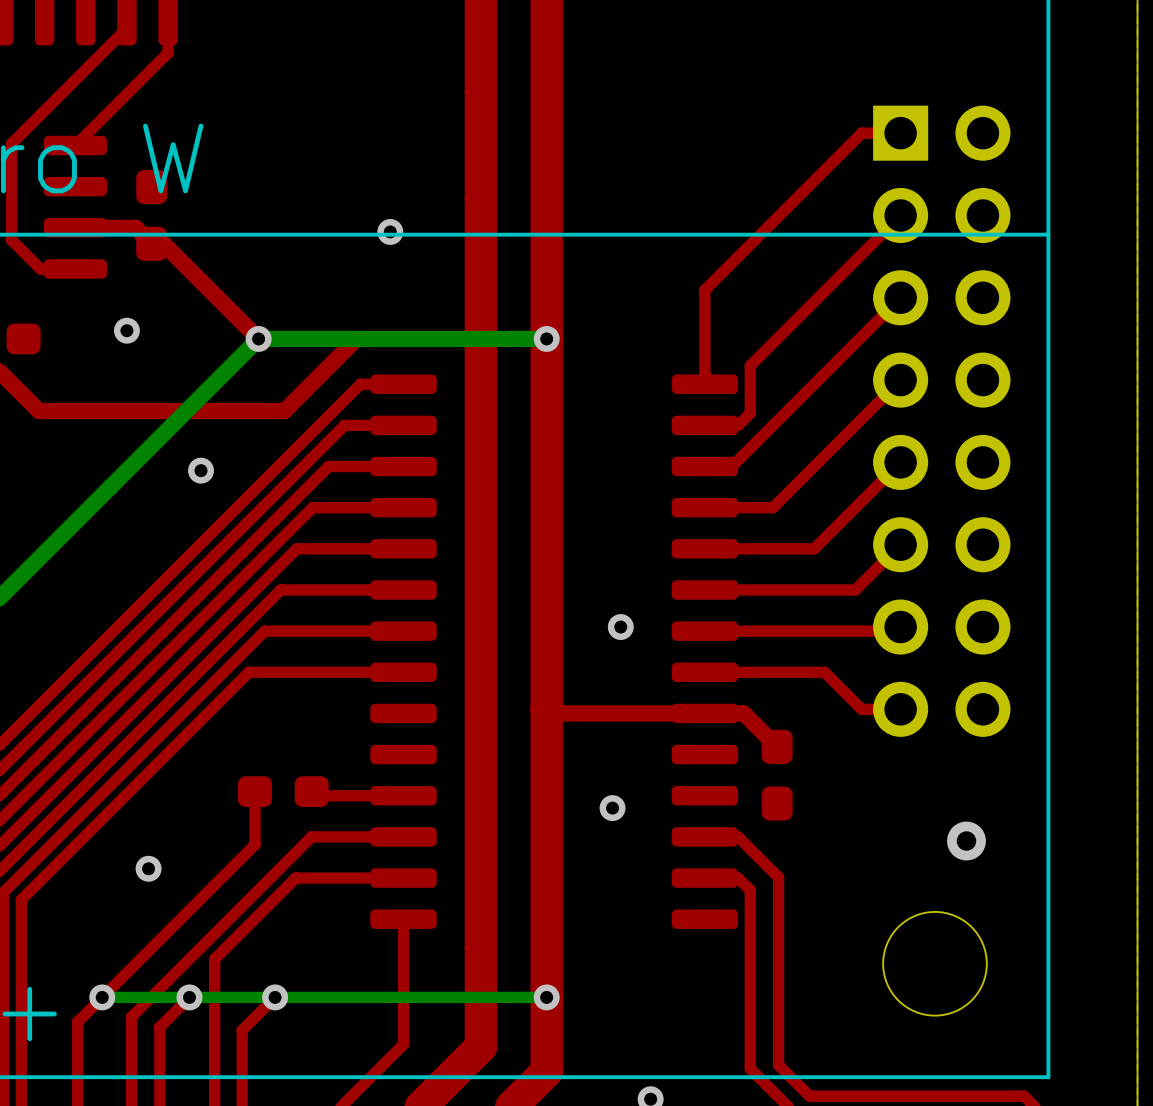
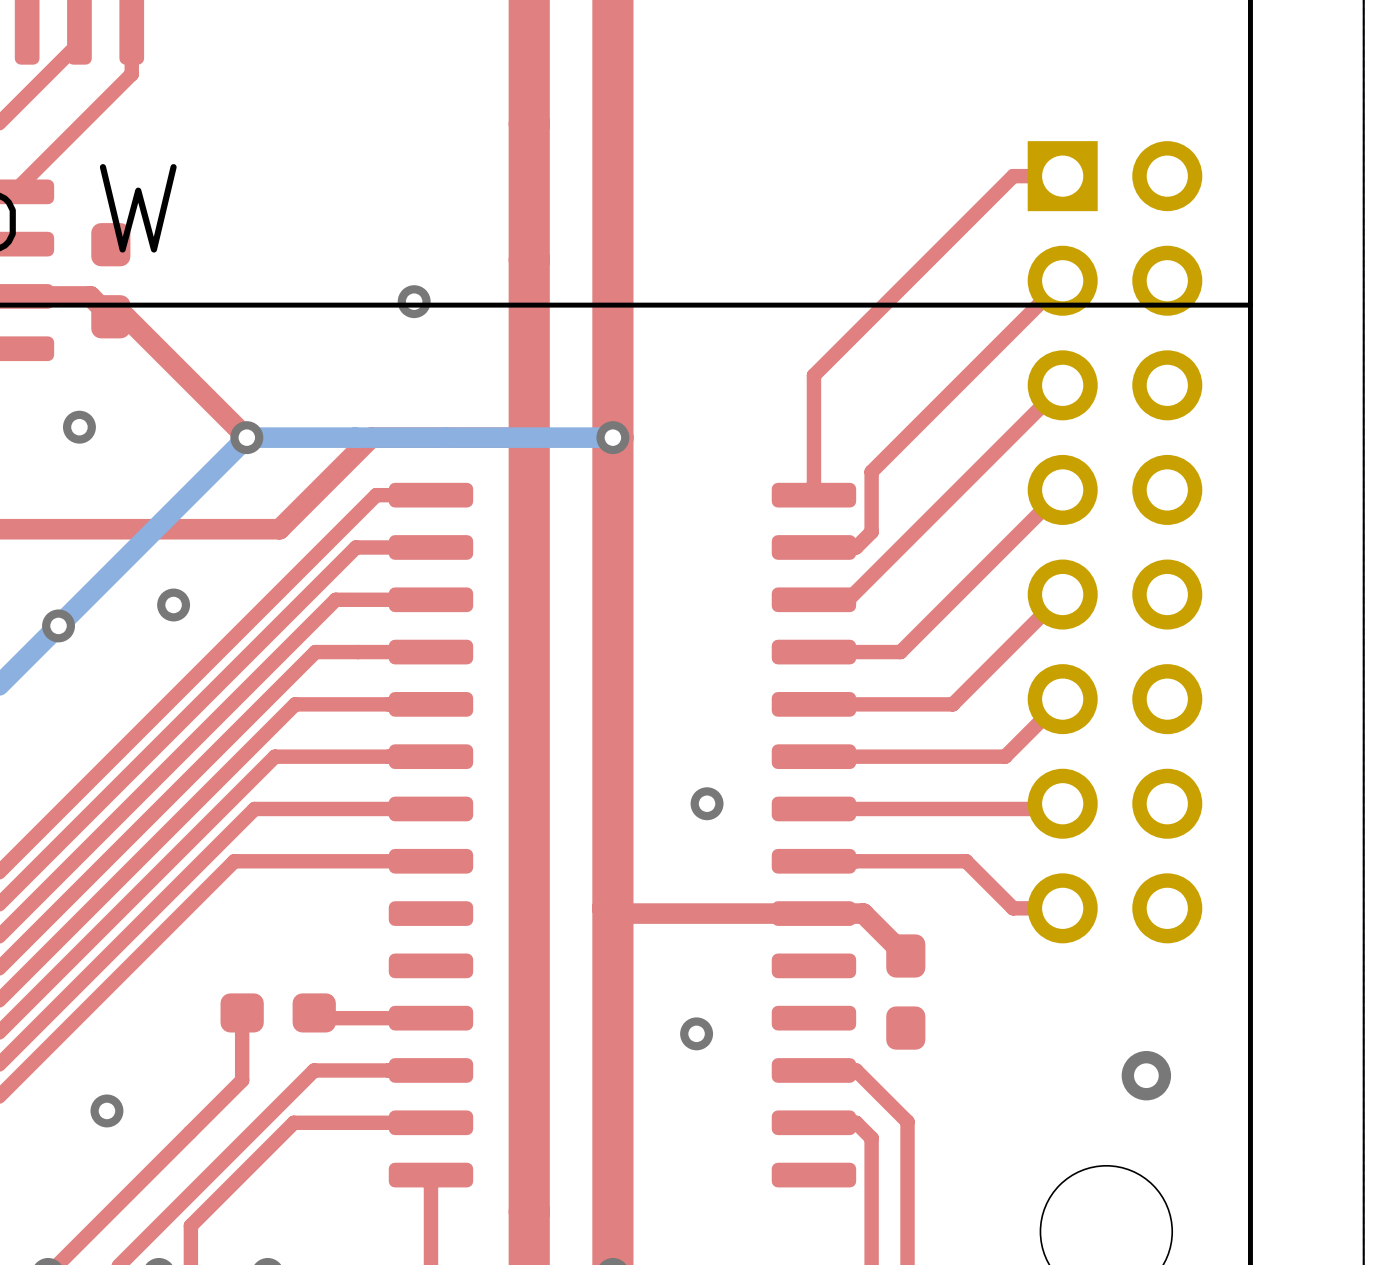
via: none -> (58, 625)

